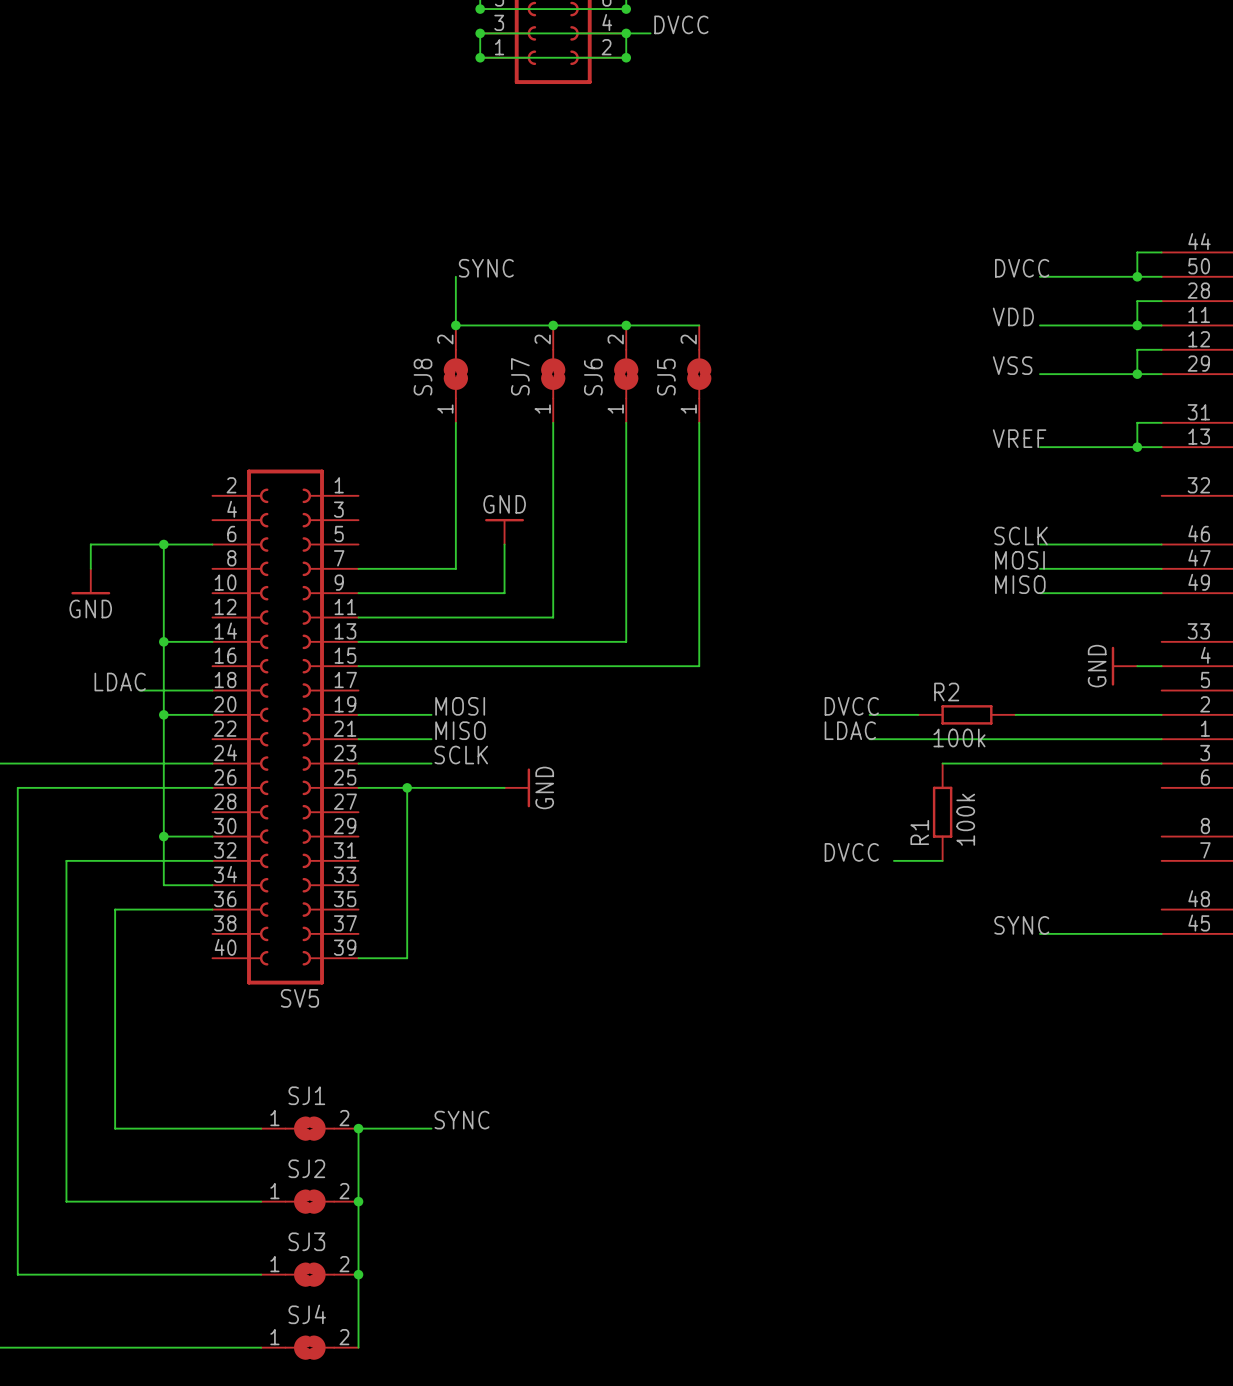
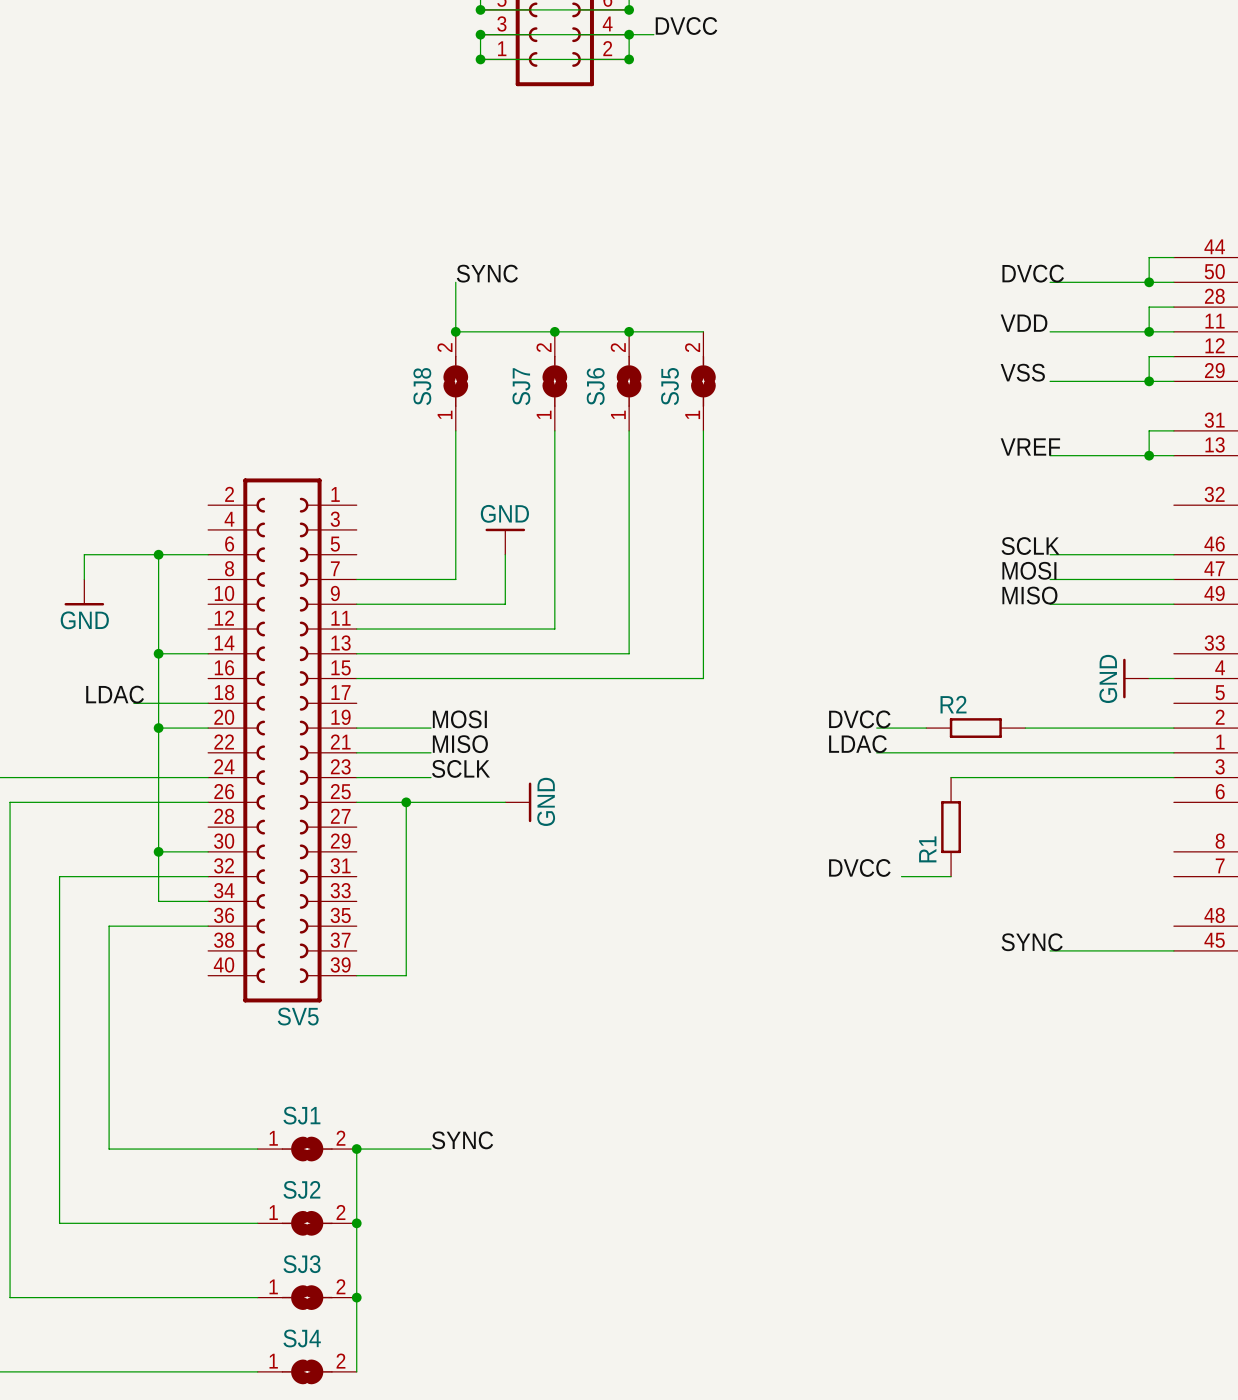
R2 value: 100k (959, 737) -> none
R1 value: 100k (965, 819) -> none

